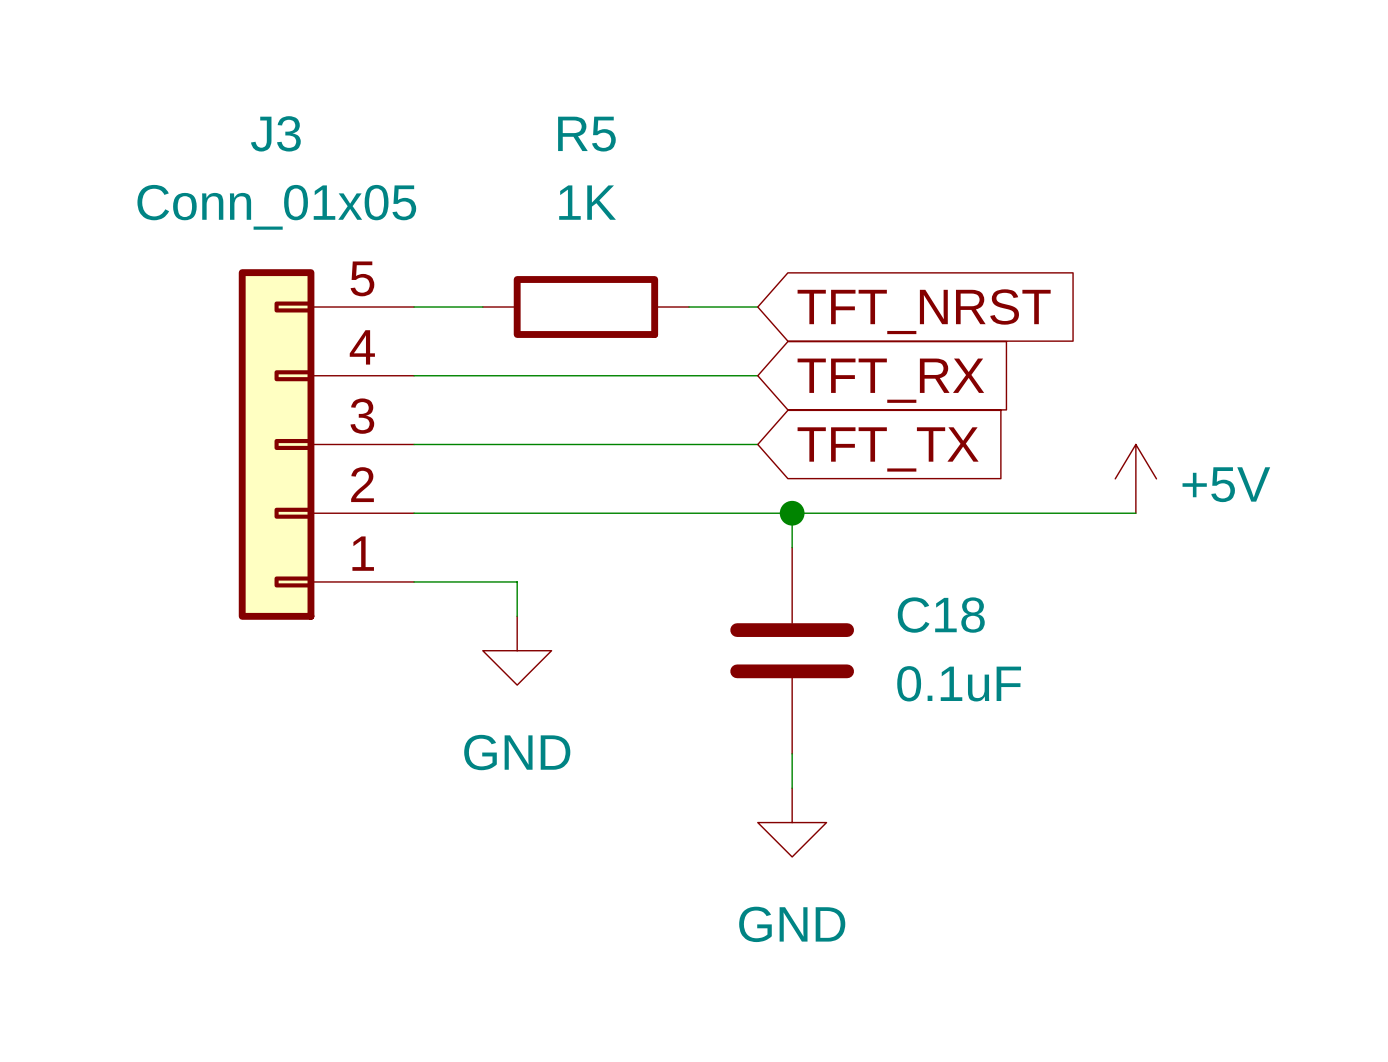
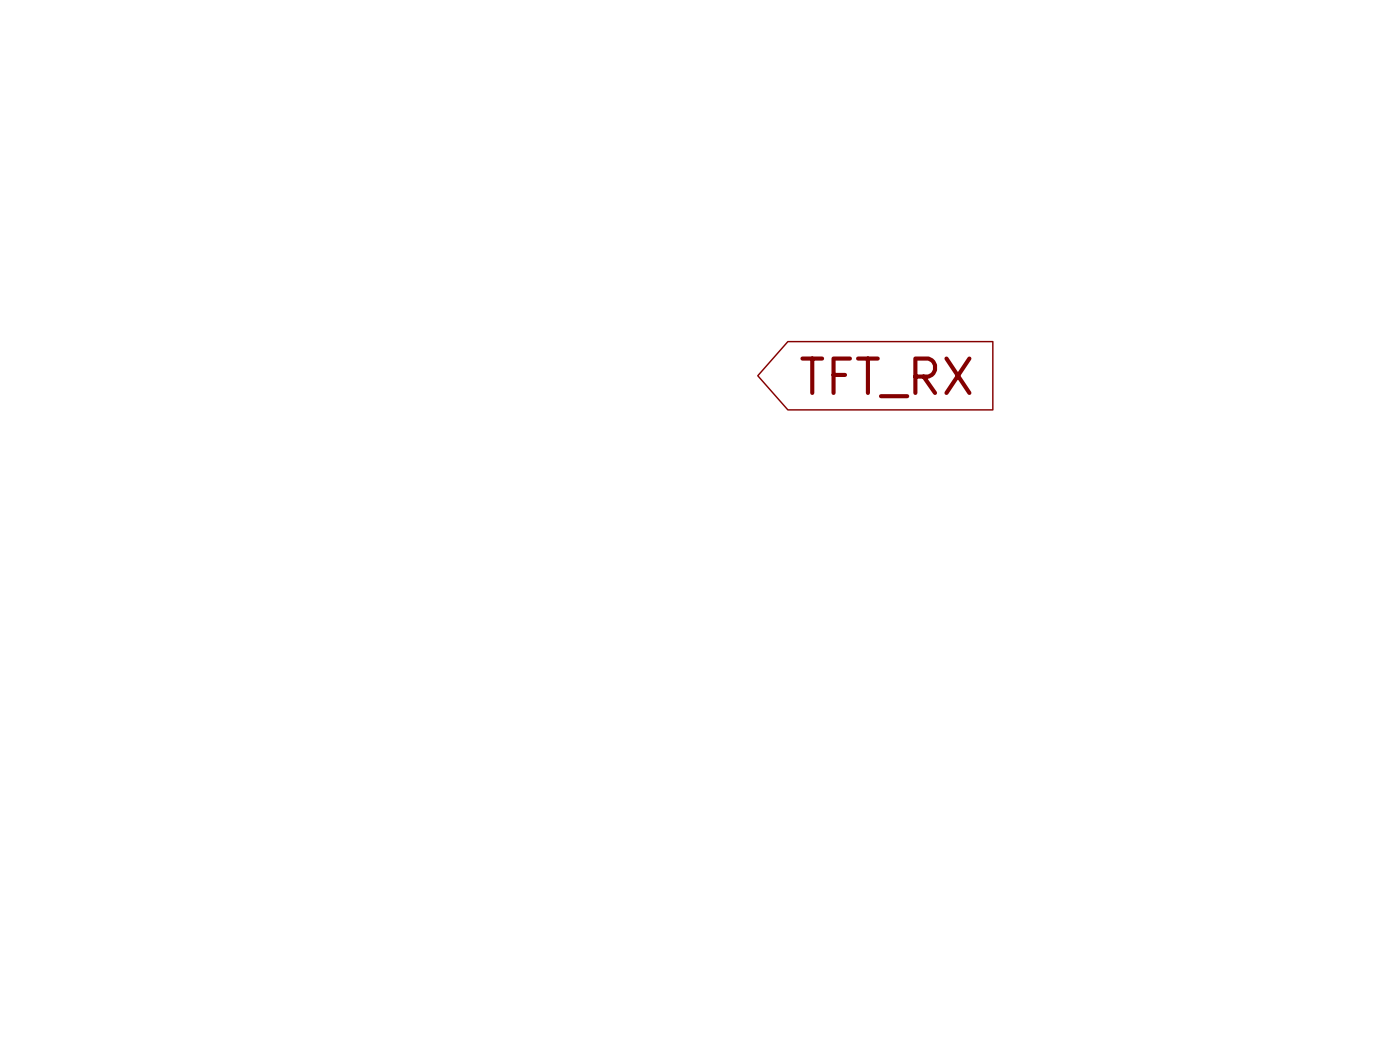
wire: (414, 307) (482, 307) -> none
R5: 1K (585, 307) -> none
wire: (689, 307) (757, 307) -> none
global label: TFT_NRST (924, 311) -> none
wire: (414, 375) (757, 375) -> none
J3: Conn_01x05 (326, 444) -> none
wire: (414, 444) (757, 444) -> none
global label: TFT_TX (888, 449) -> none
power symbol: +5V (1135, 478) -> none
wire: (414, 513) (1135, 513) -> none
wire: (792, 513) (792, 547) -> none
junction: (792, 513) -> none
wire: (414, 581) (517, 581) (517, 616) -> none
power symbol: GND (517, 650) -> none
C18: 0.1uF (792, 650) -> none
wire: (792, 753) (792, 788) -> none
power symbol: GND (792, 822) -> none

